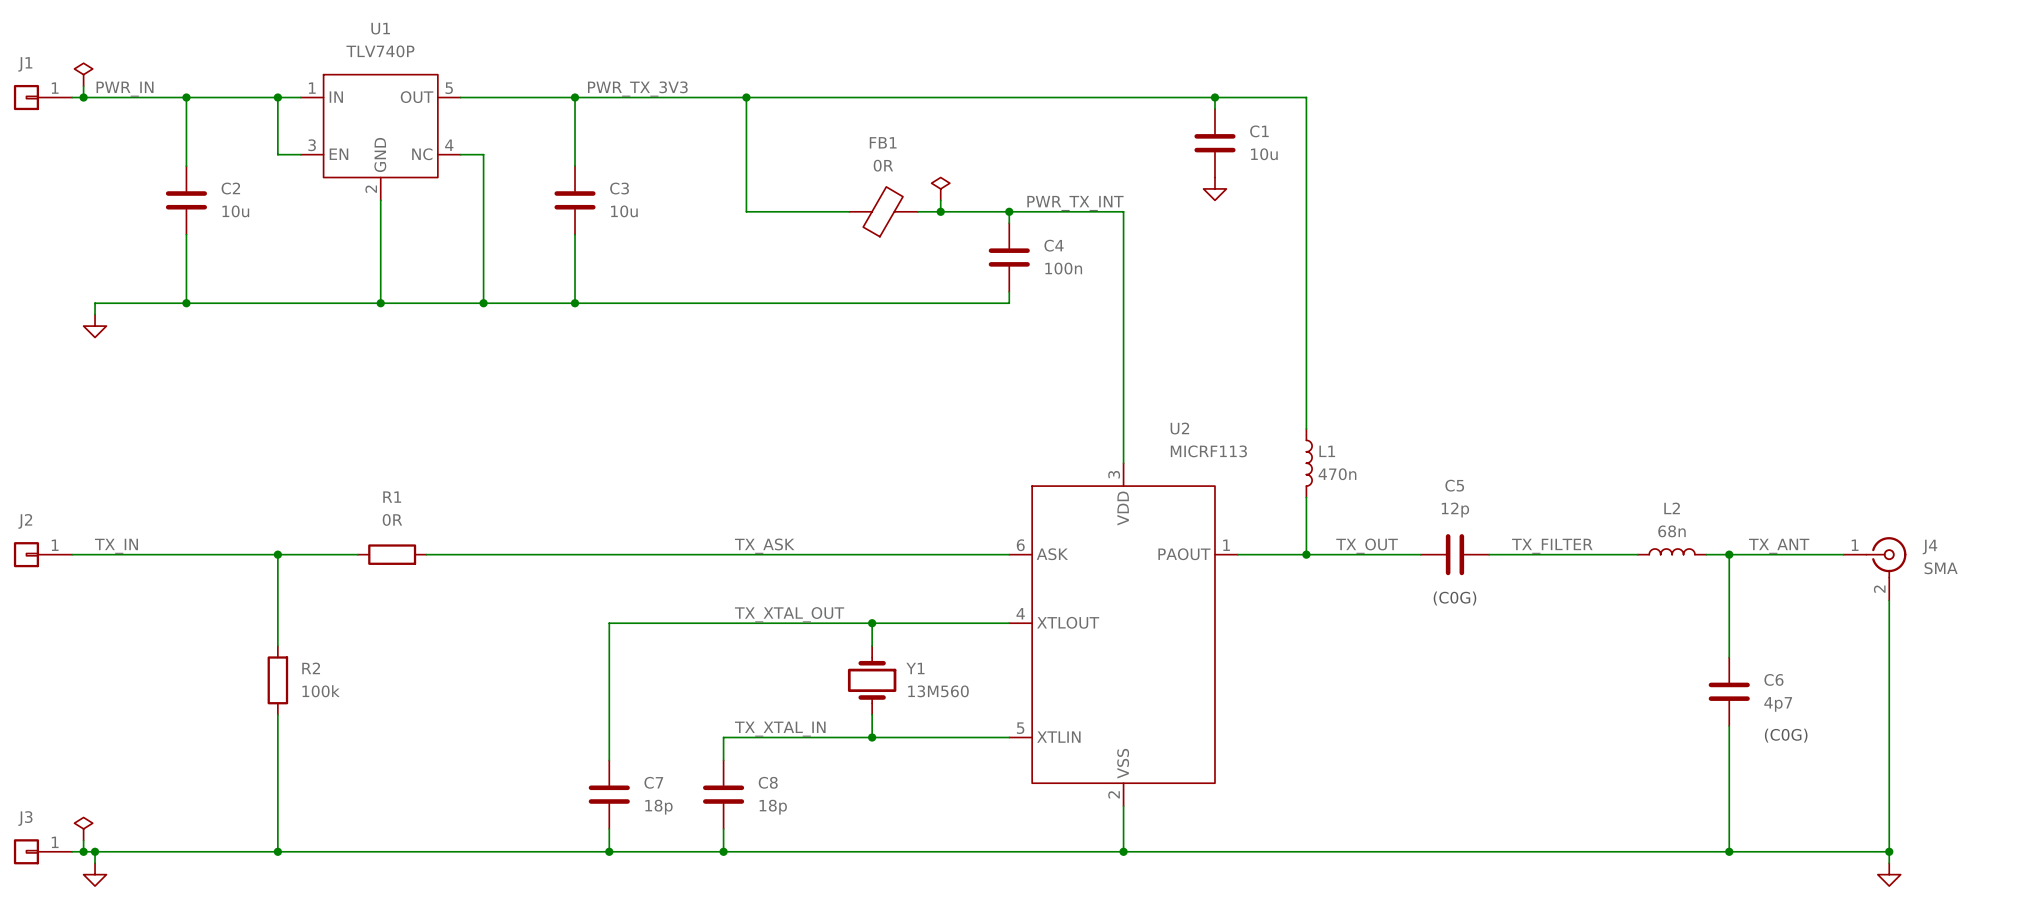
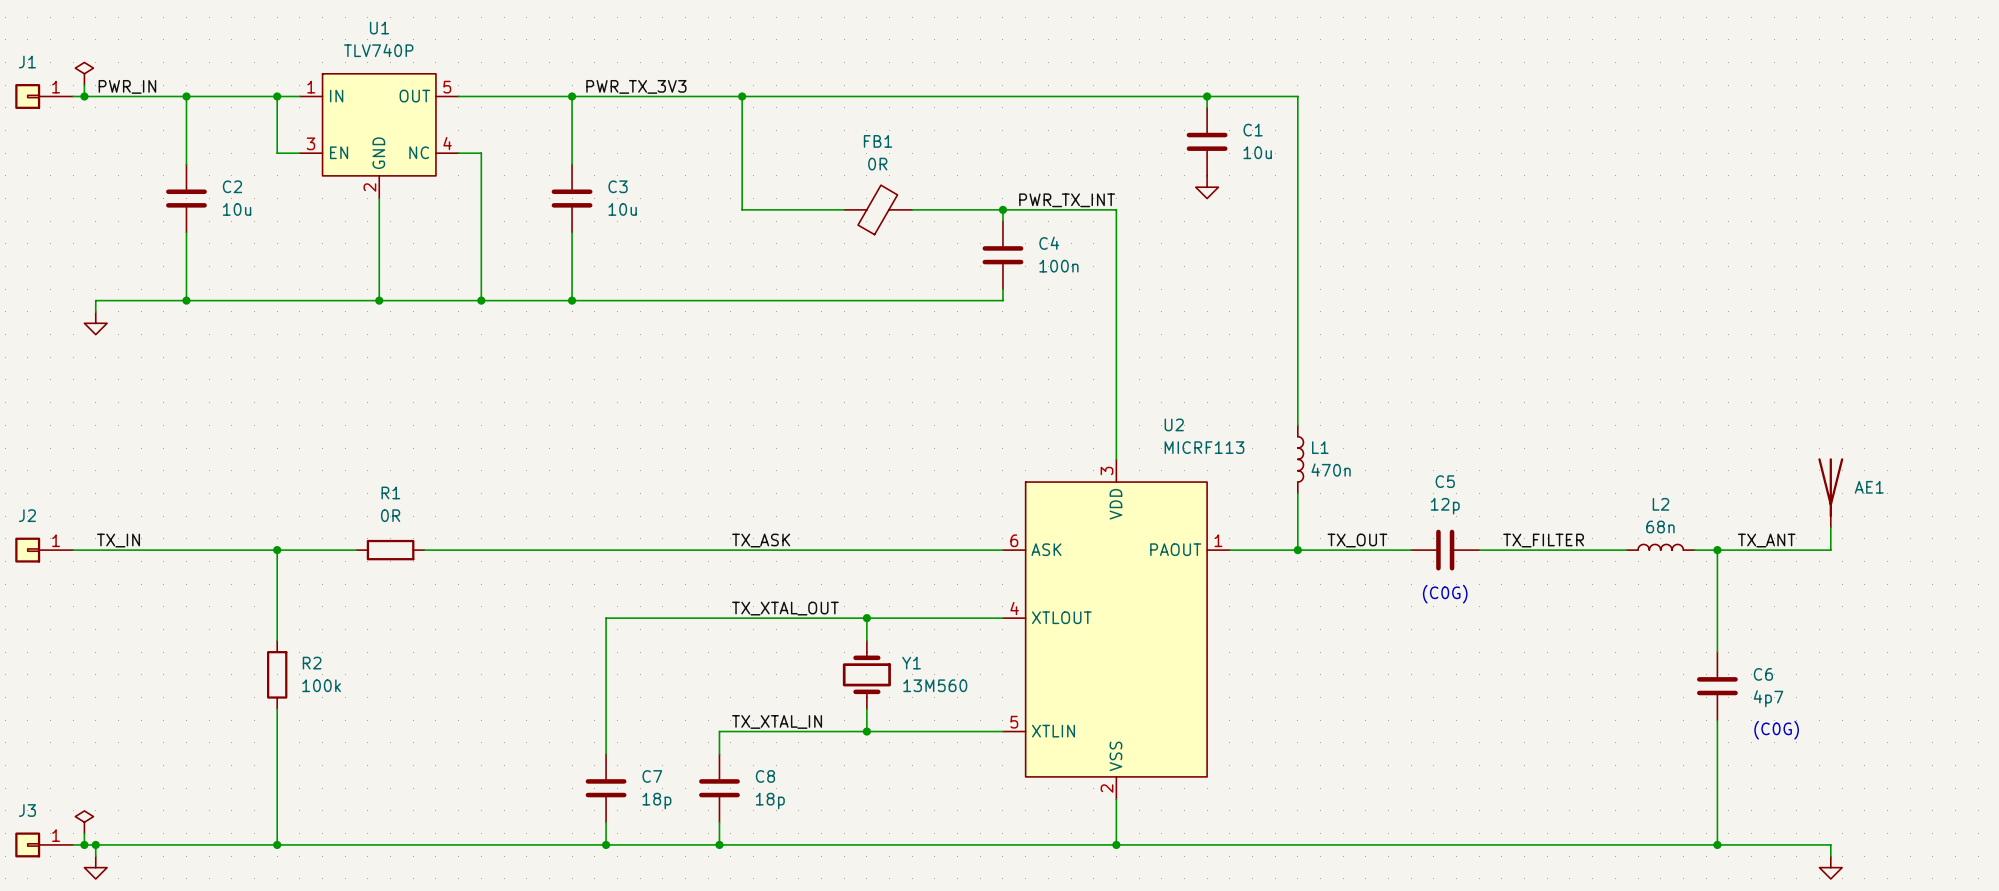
power symbol: (940, 188) -> none
wire: (940, 200) (940, 211) -> none
junction: (940, 211) -> none
AE1: none -> (1830, 492)
wire: none -> (1830, 527) (1830, 550)
J4: SMA (1874, 568) -> none
wire: (1889, 600) (1889, 863) -> none
wire: (1843, 851) (1889, 851) -> (1830, 844) (1830, 856)
junction: (1889, 851) -> none
power symbol position: (1889, 874) -> (1830, 867)

